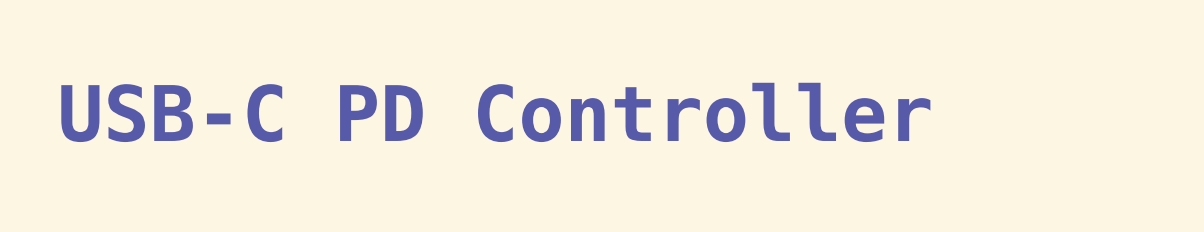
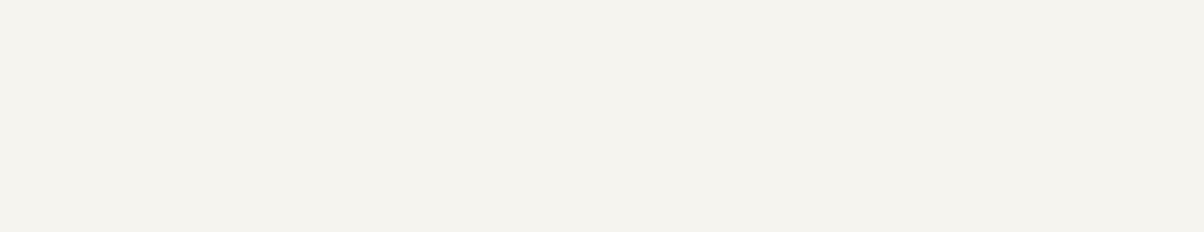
text: USB-C PD Controller (495, 112) -> none

